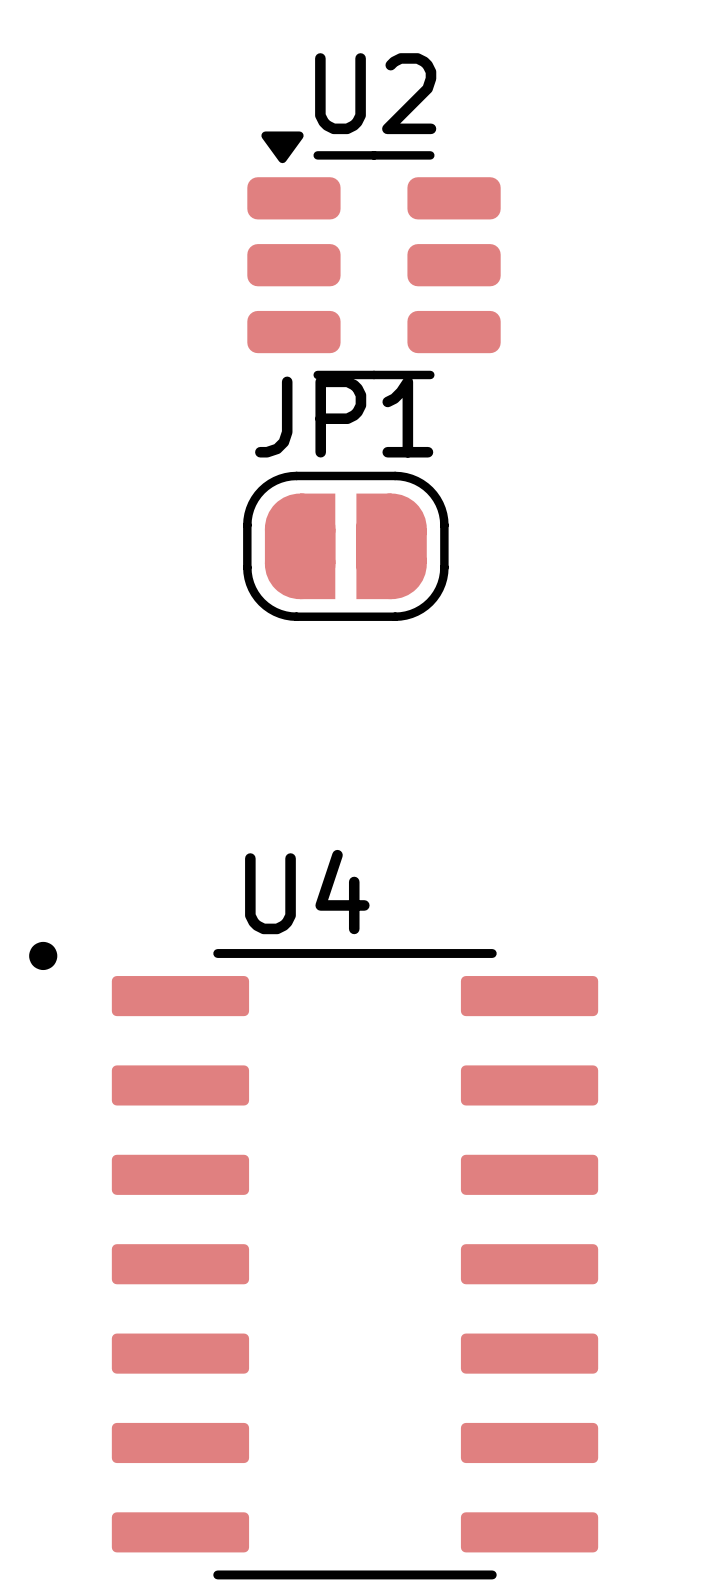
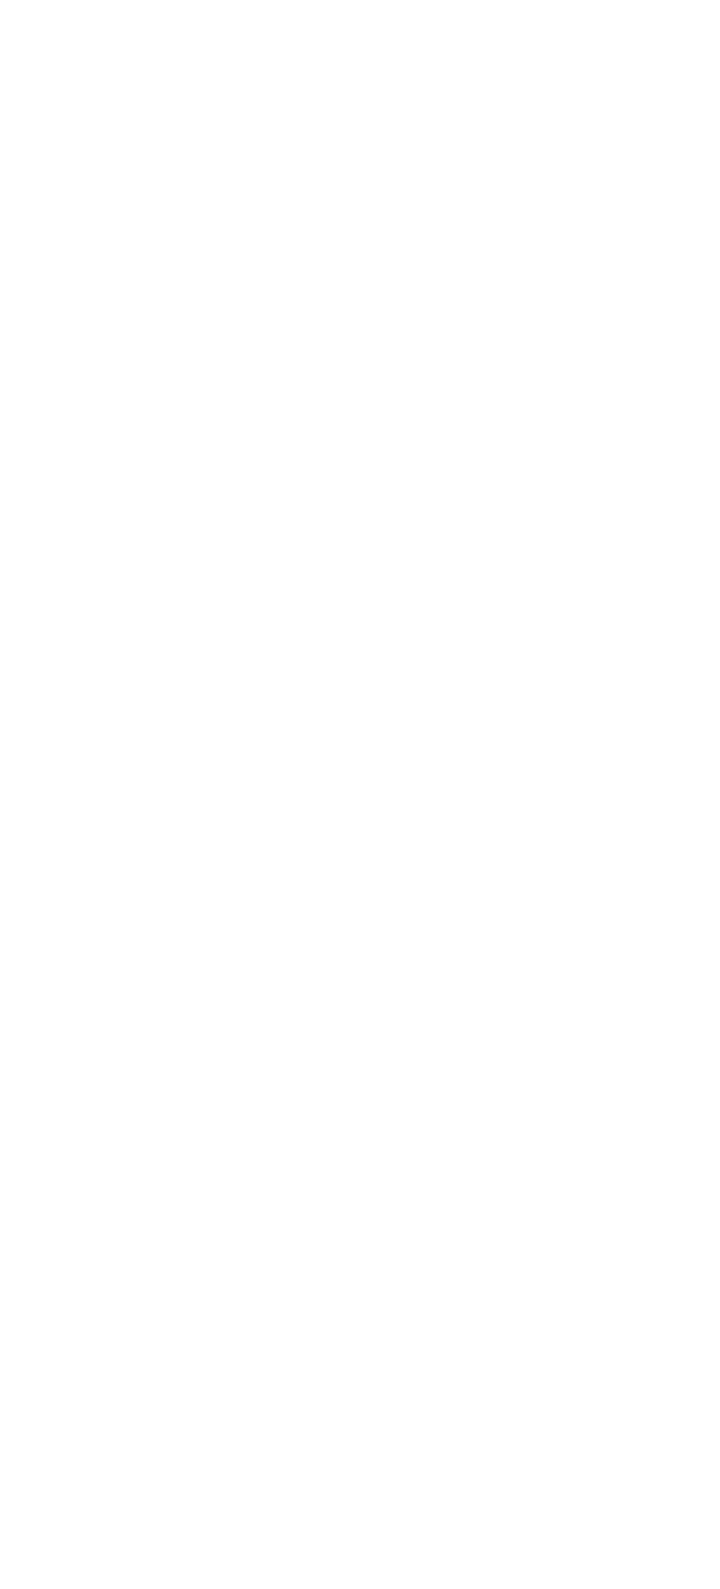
U2: (374, 255) -> none
JP1: (345, 546) -> none
U4: (313, 1260) -> none

